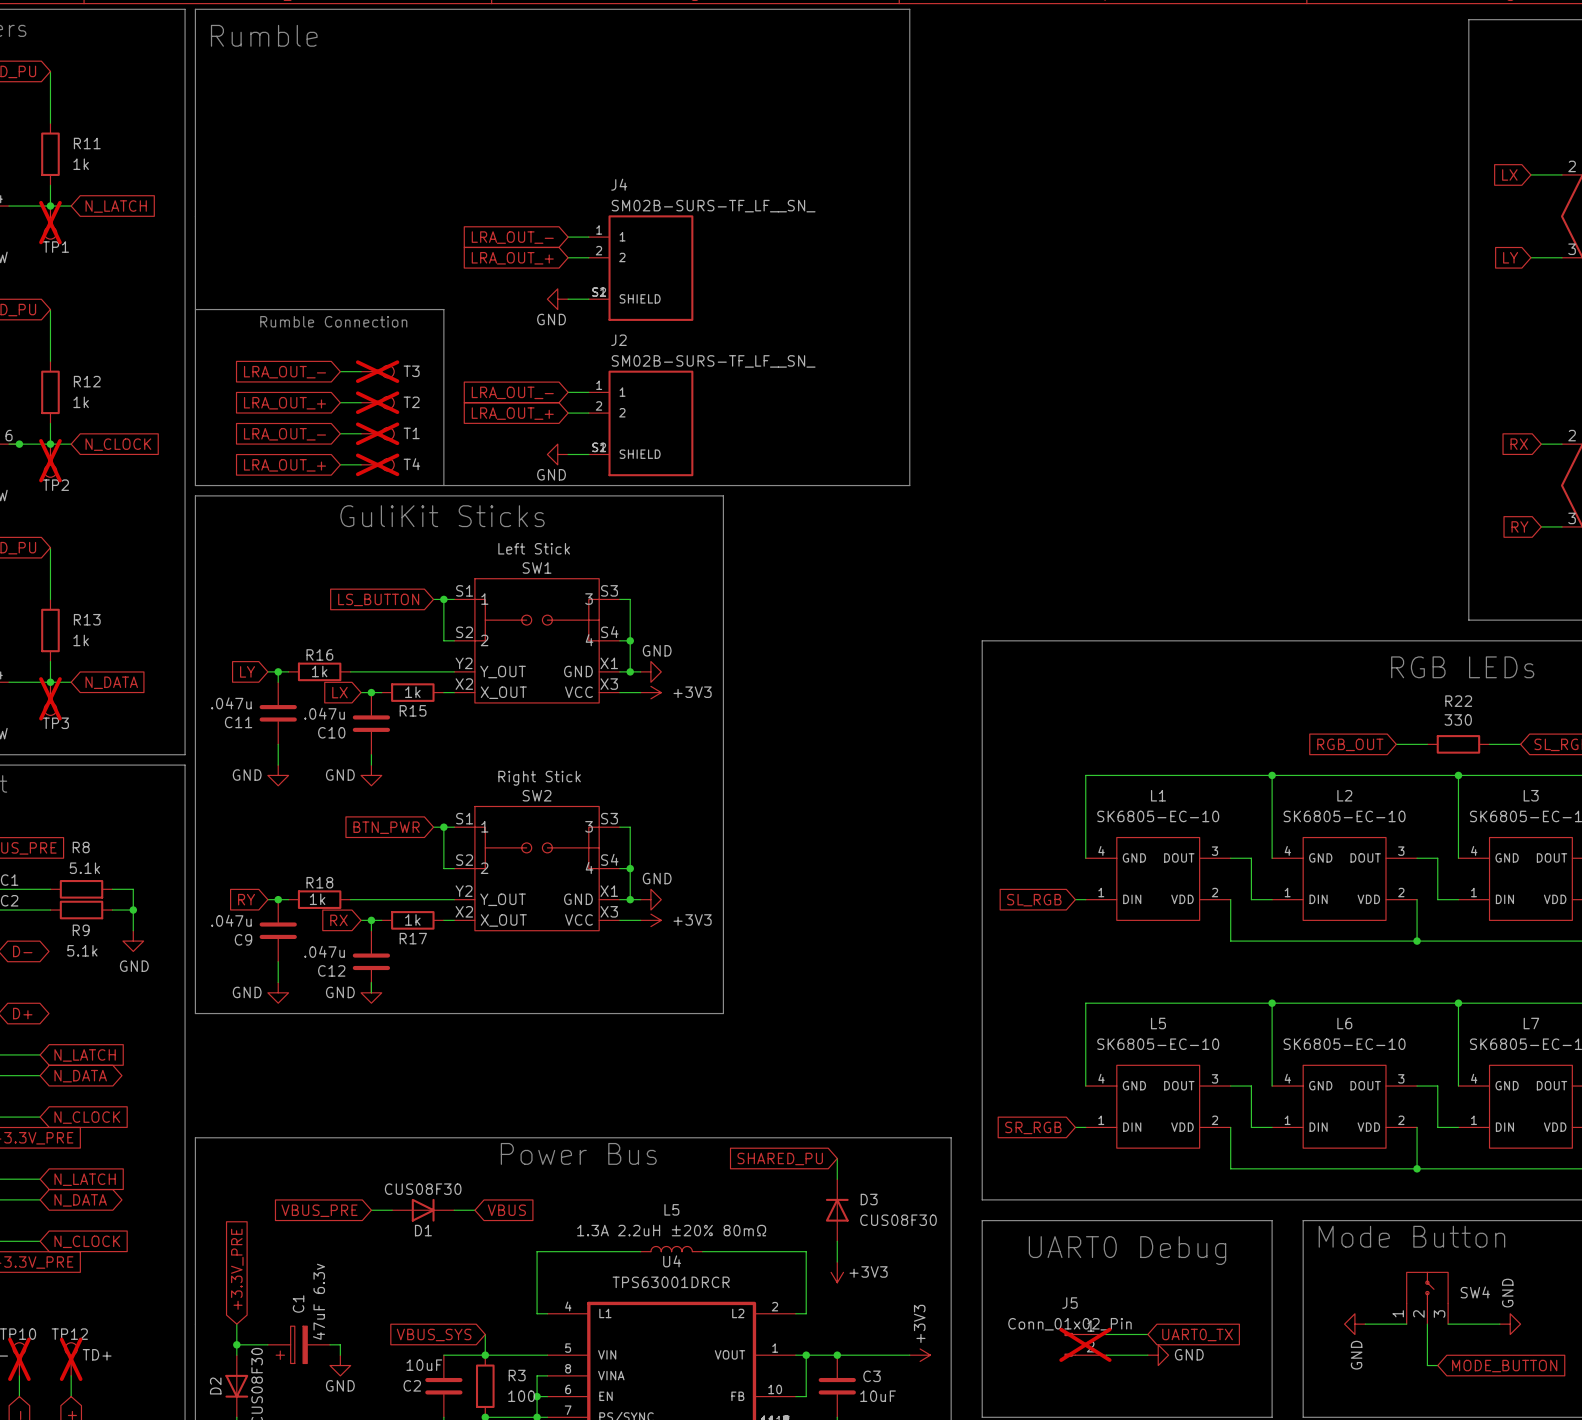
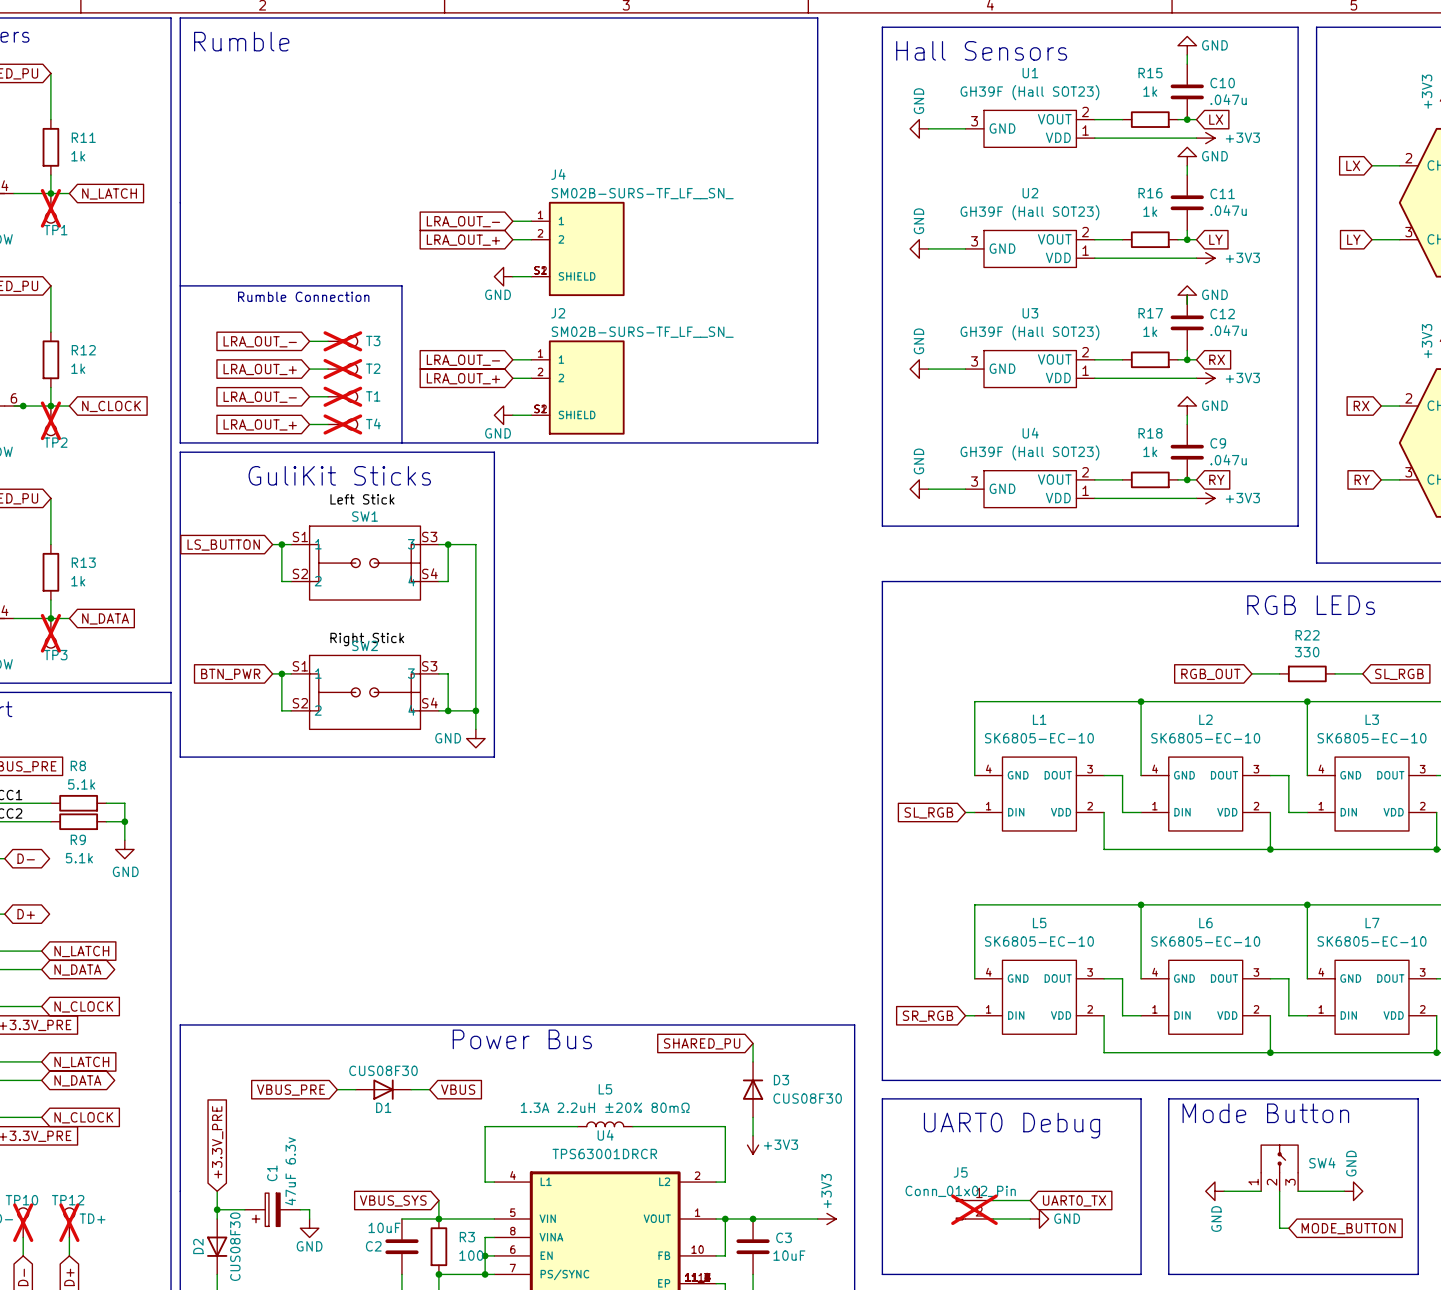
line: none -> (882, 27) (882, 526) (1298, 526) (1298, 27) (882, 27)
power symbol: none -> GND (1187, 45)
text: none -> Hall Sensors (981, 50)
wire: none -> (1187, 54) (1187, 64)
wire: none -> (1094, 119) (1122, 119)
wire: none -> (1178, 119) (1196, 119)
junction: none -> (1187, 119)
global label: none -> LX (1216, 119)
power symbol: none -> GND (919, 128)
wire: none -> (928, 128) (965, 128)
U1: none -> GH39F (Hall SOT23) (1030, 128)
wire: none -> (1094, 138) (1196, 138)
power symbol: none -> +3V3 (1205, 138)
power symbol: none -> GND (1187, 156)
wire: none -> (1187, 165) (1187, 175)
wire: none -> (1187, 230) (1187, 239)
wire: none -> (1094, 239) (1122, 239)
wire: none -> (1178, 239) (1196, 239)
junction: none -> (1187, 239)
global label: none -> LY (1215, 239)
power symbol: none -> GND (919, 248)
wire: none -> (928, 248) (965, 248)
U2: none -> GH39F (Hall SOT23) (1030, 248)
wire: none -> (1094, 258) (1196, 258)
power symbol: none -> +3V3 (1205, 258)
wire: none -> (1187, 295) (1187, 304)
power symbol: none -> GND (1187, 295)
wire: none -> (1187, 350) (1187, 359)
wire: none -> (1094, 359) (1122, 359)
wire: none -> (1178, 359) (1196, 359)
junction: none -> (1187, 359)
global label: none -> RX (1217, 359)
power symbol: none -> GND (919, 369)
wire: none -> (928, 369) (965, 369)
U3: none -> GH39F (Hall SOT23) (1030, 369)
wire: none -> (1094, 378) (1196, 378)
power symbol: none -> +3V3 (1205, 378)
power symbol: none -> GND (1187, 406)
wire: none -> (1187, 415) (1187, 424)
line: (547, 495) (723, 495) (723, 1013) (195, 1013) (195, 837) -> (494, 452) (494, 757) (180, 757)
text position: GuliKit Sticks (442, 516) -> GuliKit Sticks (339, 475)
wire: none -> (1094, 479) (1122, 479)
wire: none -> (1178, 479) (1196, 479)
junction: none -> (1187, 479)
global label: none -> RY (1216, 479)
power symbol: none -> GND (919, 489)
wire: none -> (928, 489) (965, 489)
U4: none -> GH39F (Hall SOT23) (1030, 489)
wire: none -> (1094, 498) (1196, 498)
power symbol: none -> +3V3 (1205, 498)
label position: Left Stick (534, 548) -> Left Stick (362, 499)
SW1 name position: SW1 (537, 567) -> SW1 (365, 516)
SW1 symbol: [454, 578, 620, 703] -> [291, 526, 439, 601]
junction: none -> (281, 544)
global label position: LS_BUTTON (378, 599) -> LS_BUTTON (223, 545)
wire: (433, 599) (454, 599) -> (272, 544) (291, 544)
wire: (443, 599) (443, 640) (454, 640) -> (281, 544) (281, 581) (291, 581)
junction: (443, 599) -> none
wire: none -> (438, 544) (475, 544) (475, 729)
wire: none -> (448, 544) (448, 581) (438, 581)
junction: none -> (448, 544)
wire: (619, 599) (630, 599) (630, 671) -> none
wire: (619, 640) (630, 640) -> none
junction: (630, 640) -> none
R16 name position: R16 (319, 654) -> R16 (1150, 193)
global label: LY (247, 671) -> none
wire: (267, 671) (288, 671) -> none
wire: (278, 671) (278, 682) -> none
junction: (278, 671) -> none
R16 position: (319, 671) -> (1150, 239)
R16 value position: 1k (319, 671) -> 1k (1150, 211)
wire: (350, 671) (454, 671) -> none
wire: (619, 671) (640, 671) -> none
junction: (630, 671) -> none
power symbol: GND (650, 671) -> none
global label: LX (339, 692) -> none
wire: (361, 692) (381, 692) -> none
junction: (371, 692) -> none
R15 position: (412, 692) -> (1150, 119)
R15 value position: 1k (412, 692) -> 1k (1150, 91)
wire: (443, 692) (454, 692) -> none
wire: (619, 692) (640, 692) -> none
power symbol: +3V3 (650, 692) -> none
C11 value position: .047u (231, 703) -> .047u (1228, 210)
R15 name position: R15 (413, 710) -> R15 (1150, 73)
C11 position: (278, 713) -> (1187, 202)
C10 value position: .047u (324, 713) -> .047u (1228, 99)
C11 name position: C11 (238, 722) -> C11 (1222, 193)
C10 position: (371, 723) -> (1187, 91)
C10 name position: C10 (331, 732) -> C10 (1222, 83)
wire: (278, 744) (278, 765) -> none
junction: none -> (281, 673)
wire: none -> (438, 673) (448, 673) (448, 710)
wire: (371, 754) (371, 765) -> none
power symbol: GND (278, 775) -> none
power symbol: GND (371, 775) -> none
label position: Right Stick (539, 778) -> Right Stick (367, 639)
wire: none -> (438, 710) (475, 710)
junction: none -> (448, 710)
junction: none -> (475, 710)
SW2 name position: SW2 (537, 795) -> SW2 (365, 645)
SW2 symbol: [454, 806, 620, 931] -> [291, 655, 439, 730]
power symbol: none -> GND (475, 738)
global label position: BTN_PWR (386, 827) -> BTN_PWR (230, 674)
wire: (433, 827) (454, 827) -> (272, 673) (291, 673)
wire: (443, 827) (443, 868) (454, 868) -> (281, 673) (281, 710) (291, 710)
junction: (443, 827) -> none
wire: (619, 827) (630, 827) (630, 899) -> none
wire: (619, 868) (630, 868) -> none
junction: (630, 868) -> none
R18 name position: R18 (319, 882) -> R18 (1150, 433)
global label: RY (246, 899) -> none
wire: (267, 899) (288, 899) -> none
junction: (278, 899) -> none
R18 value position: 1k (317, 899) -> 1k (1150, 451)
R18 position: (319, 899) -> (1150, 479)
wire: (350, 899) (454, 899) -> none
wire: (619, 899) (640, 899) -> none
junction: (630, 899) -> none
power symbol: GND (650, 899) -> none
R17 value position: 1k (412, 919) -> 1k (1150, 331)
C9 value position: .047u (231, 920) -> .047u (1228, 459)
global label: RX (338, 920) -> none
wire: (361, 920) (381, 920) -> none
wire: (371, 920) (371, 930) -> none
junction: (371, 920) -> none
R17 position: (412, 920) -> (1150, 359)
wire: (443, 920) (454, 920) -> none
wire: (619, 920) (640, 920) -> none
power symbol: +3V3 (650, 920) -> none
C9 position: (278, 930) -> (1187, 452)
R17 name position: R17 (413, 938) -> R17 (1150, 313)
C9 name position: C9 (243, 939) -> C9 (1218, 443)
C12 value position: .047u (324, 951) -> .047u (1228, 330)
wire: (278, 961) (278, 982) -> none
C12 position: (371, 961) -> (1187, 322)
C12 name position: C12 (331, 970) -> C12 (1222, 314)
wire: (371, 982) (371, 992) -> none
power symbol: GND (278, 992) -> none
power symbol: GND (371, 992) -> none

